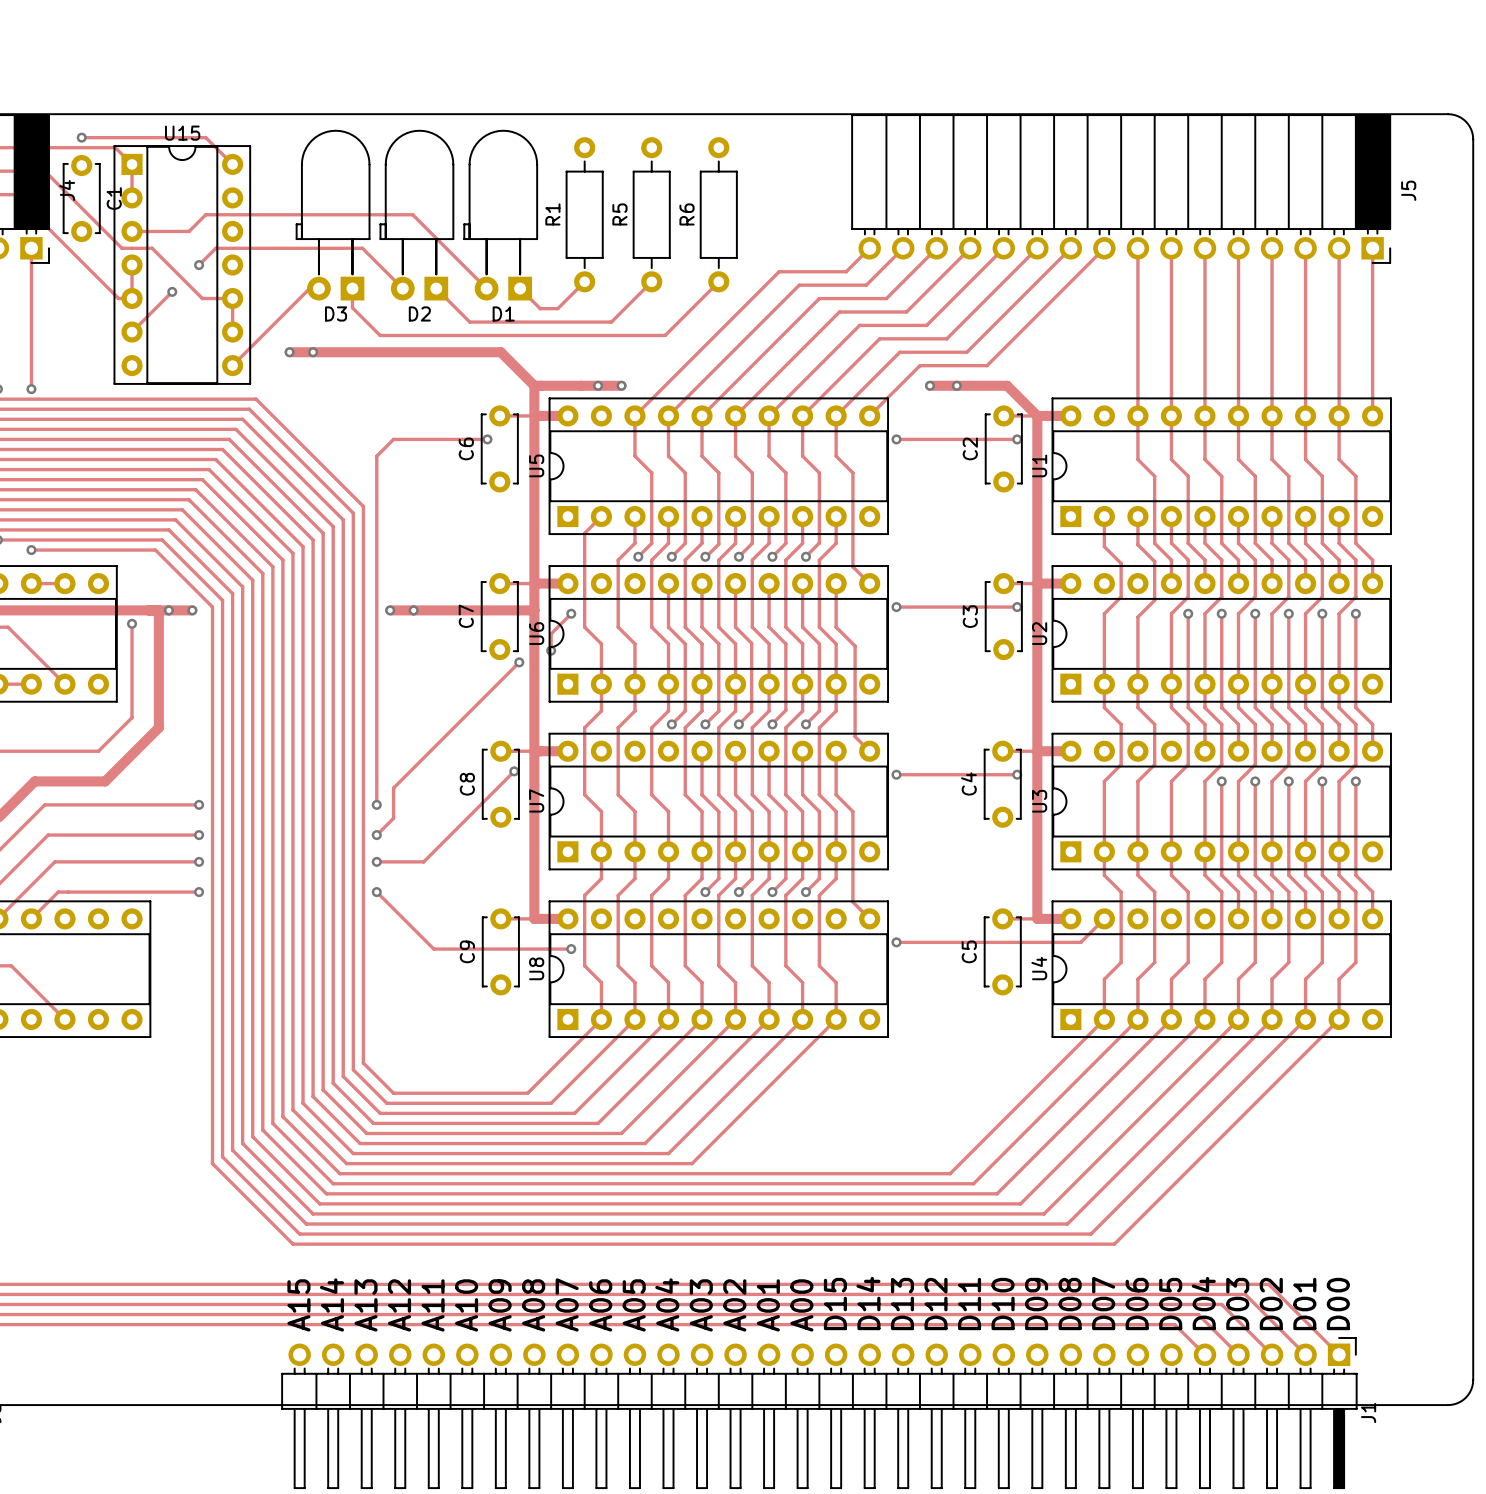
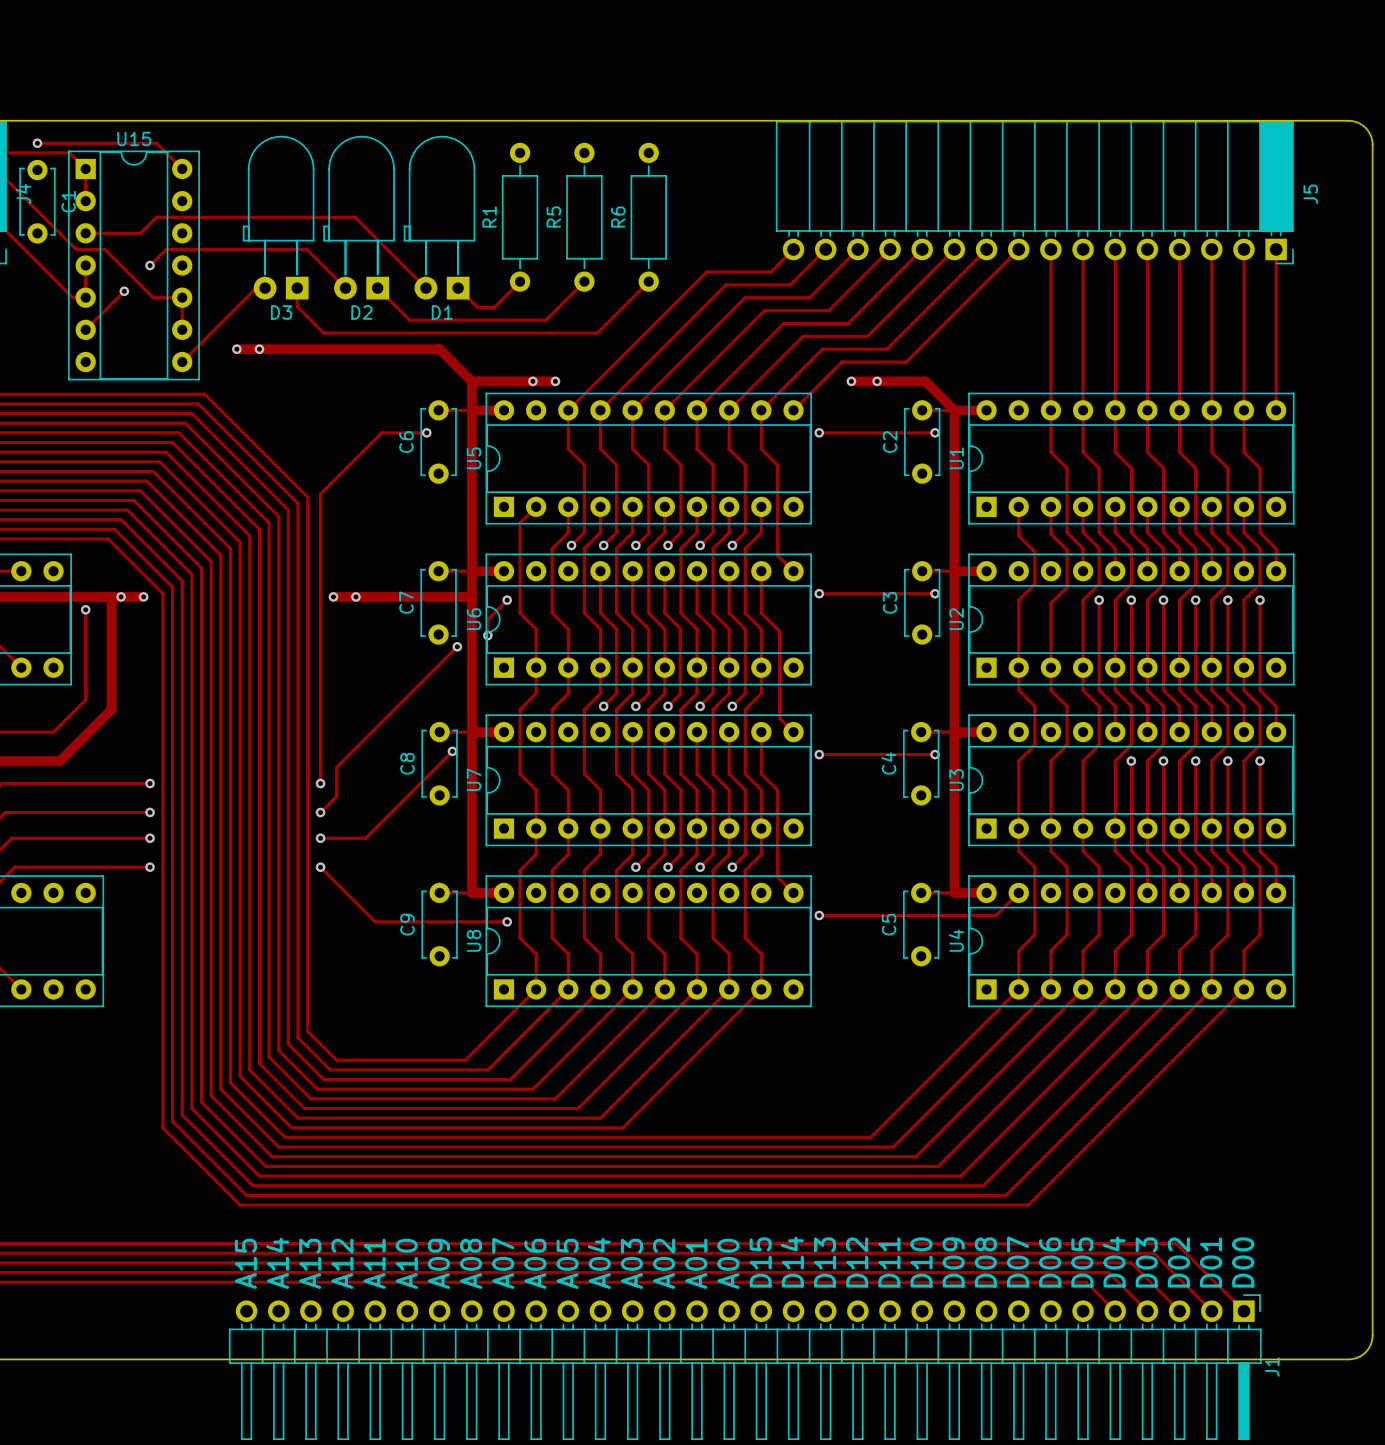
track: (440, 439) (393, 439) (376, 456) (376, 503) -> (381, 432) (320, 493)

